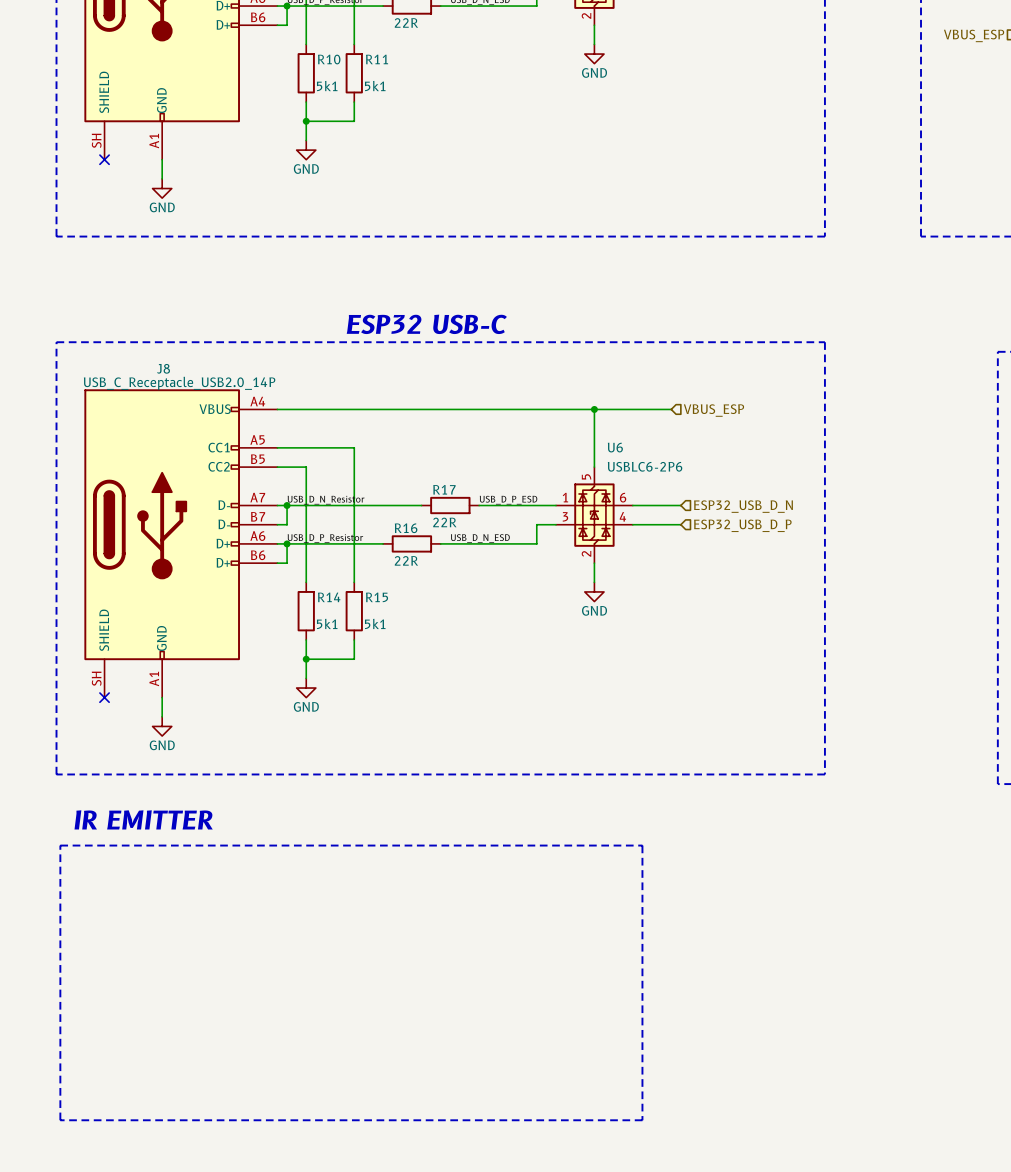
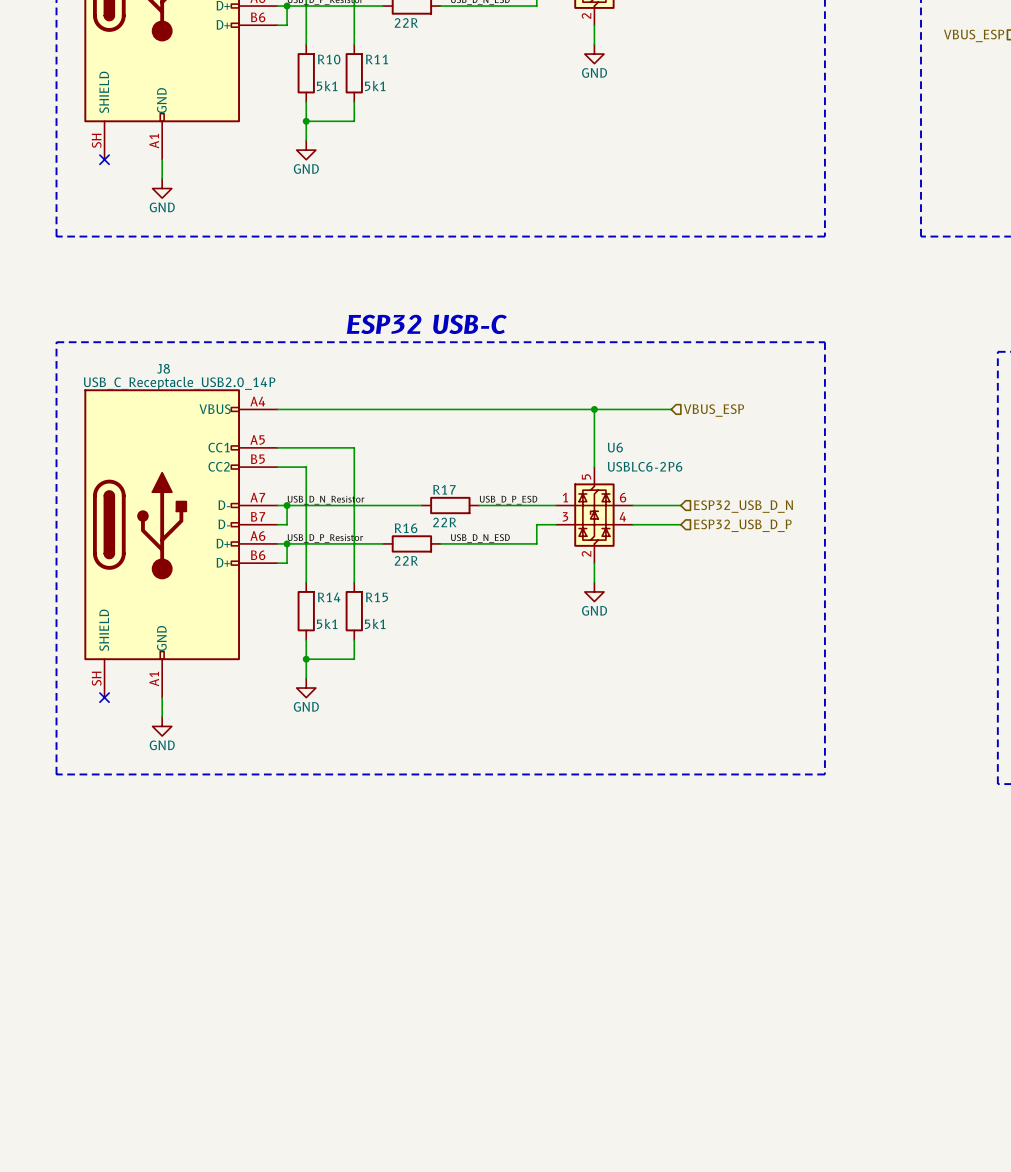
text: IR EMITTER (143, 819) -> none
line: (60, 845) (642, 845) (642, 1120) (60, 1120) (60, 845) -> none

